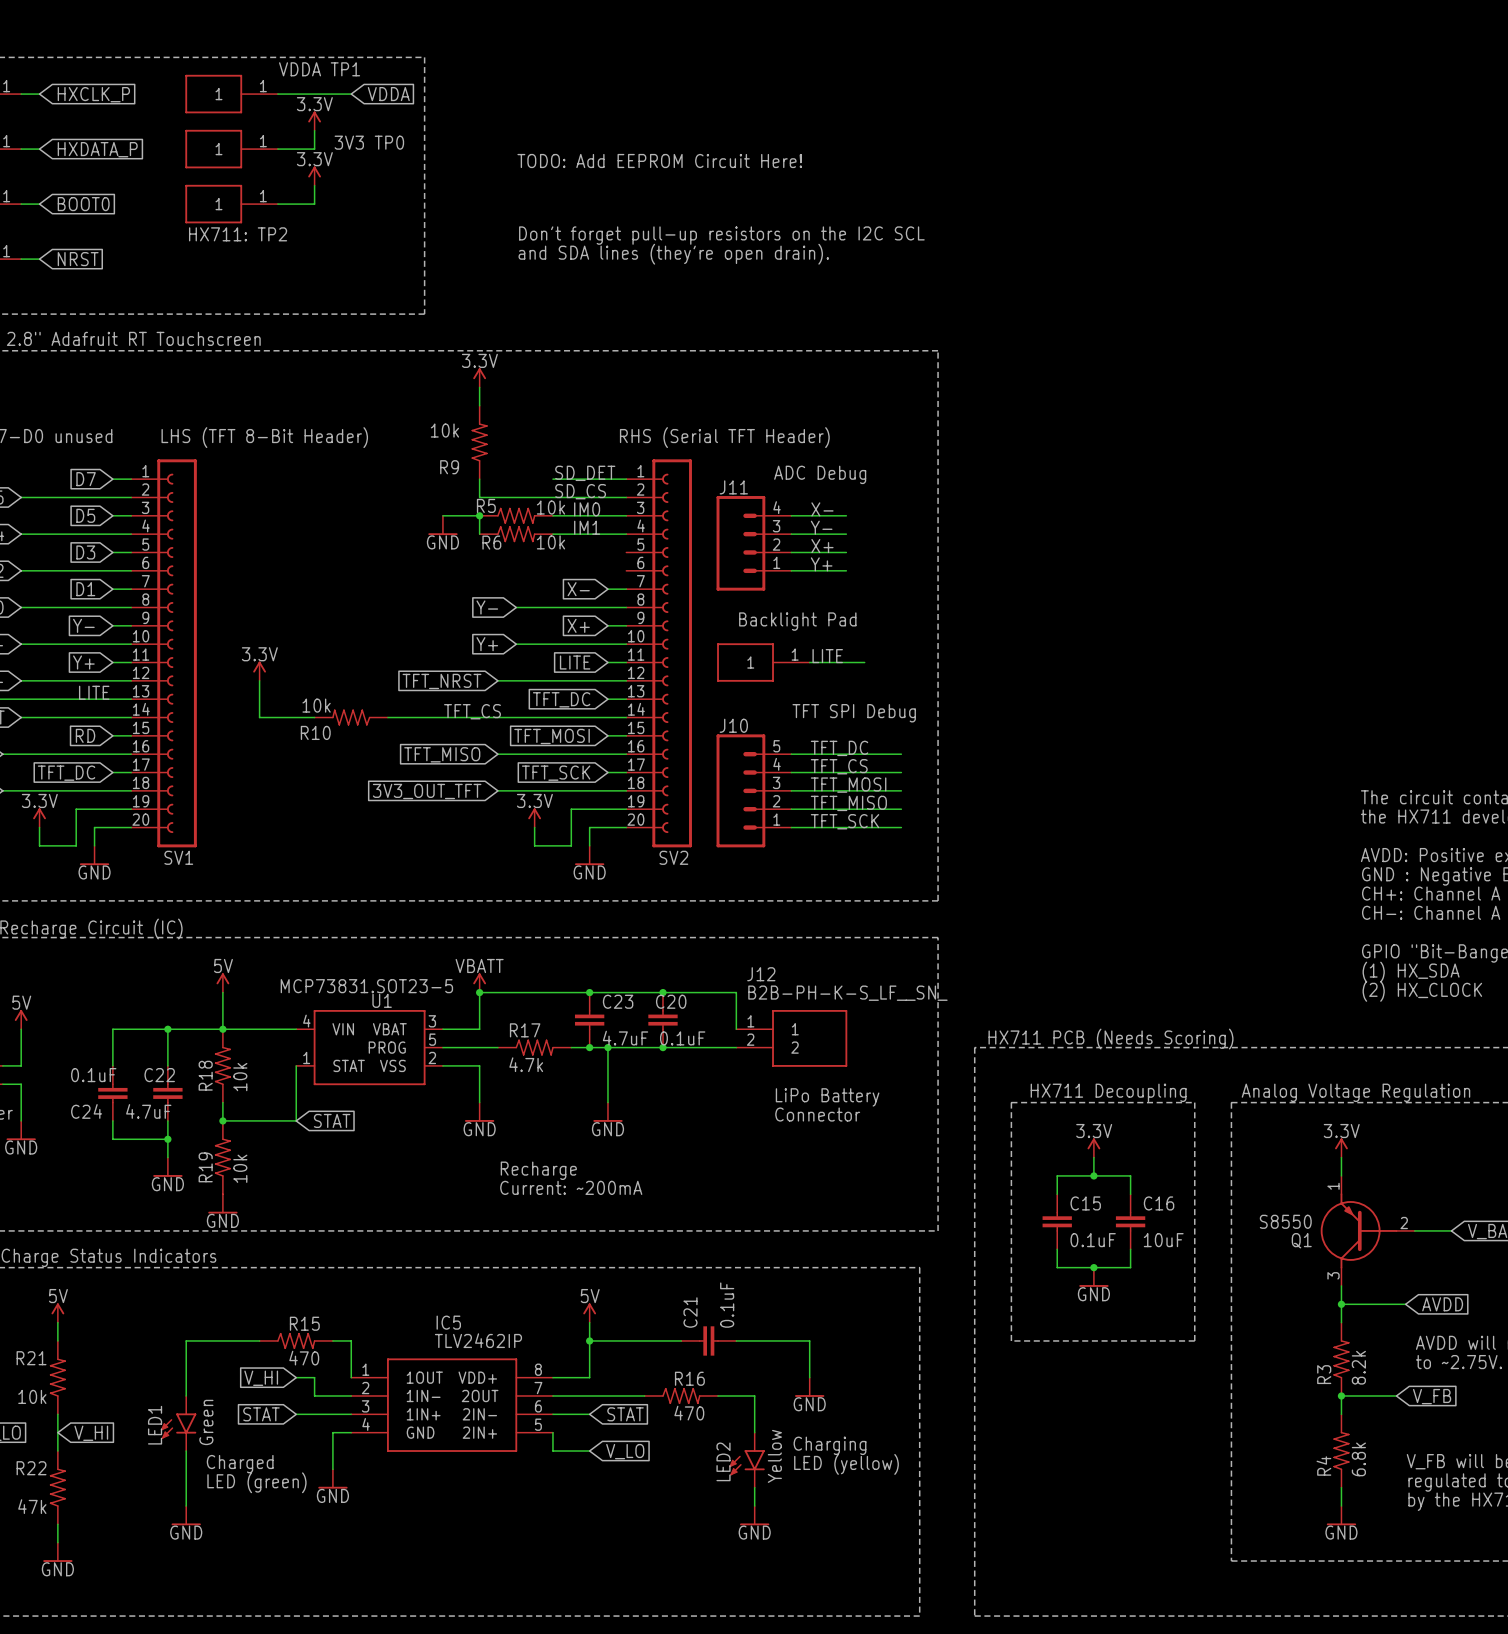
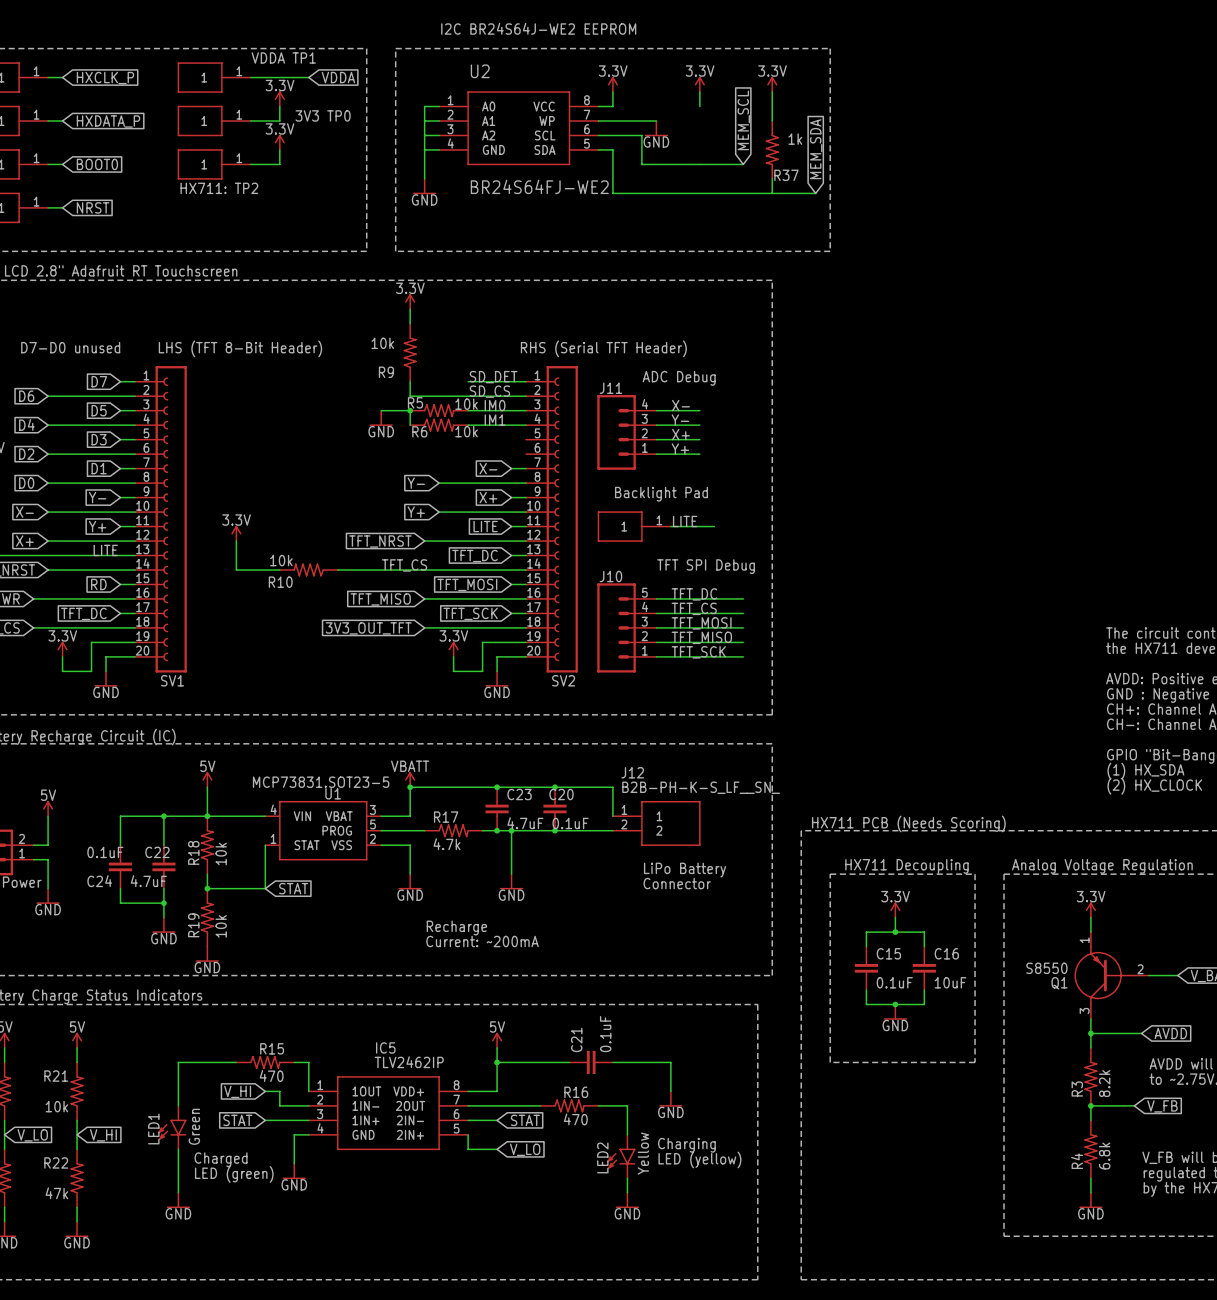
text: none -> I2C BR24S64J-WE2 EEPROM (538, 28)
line: none -> (395, 48) (830, 48) (830, 251) (395, 251) (395, 48)
power symbol: none -> 3.3V (612, 84)
power symbol: none -> 3.3V (699, 84)
power symbol: none -> 3.3V (772, 84)
wire: none -> (612, 92) (612, 106) (598, 106)
wire: none -> (699, 92) (699, 106)
wire: none -> (772, 92) (772, 121)
wire: none -> (439, 106) (424, 106) (424, 178)
global label: none -> MEM_SCL (743, 120)
wire: none -> (424, 121) (439, 121)
wire: none -> (598, 121) (656, 121)
U2: none -> BR24S64FJ-WE2 (518, 128)
power symbol: none -> GND (656, 128)
text: TODO: Add EEPROM Circuit Here! (659, 161) -> none
wire: none -> (424, 135) (439, 135)
wire: none -> (598, 135) (641, 135) (641, 164) (743, 164)
global label: none -> MEM_SDA (816, 149)
wire: none -> (424, 149) (439, 149)
wire: none -> (598, 149) (612, 149) (612, 193) (815, 193)
R37: none -> 1k (772, 149)
wire: none -> (772, 178) (772, 193)
power symbol: none -> GND (424, 186)
text: Don't forget pull-up resistors on the I2C SCL (721, 235) -> none
text: and SDA lines (they're open drain). (673, 254) -> none

